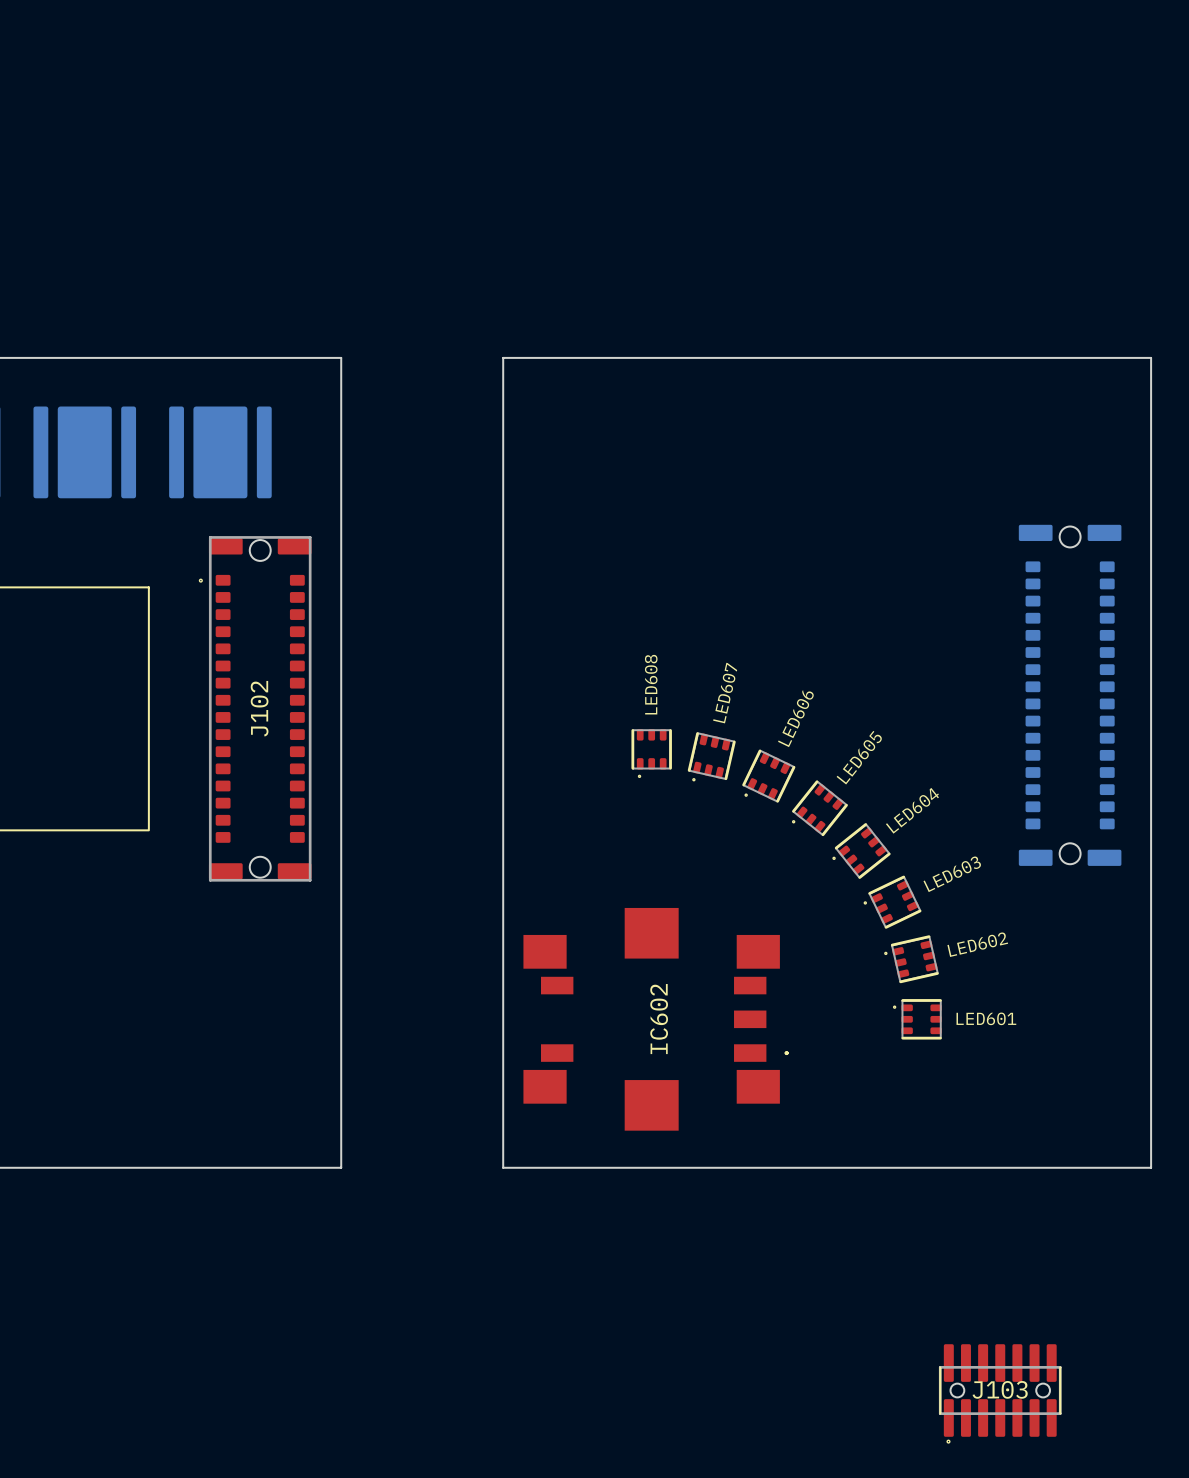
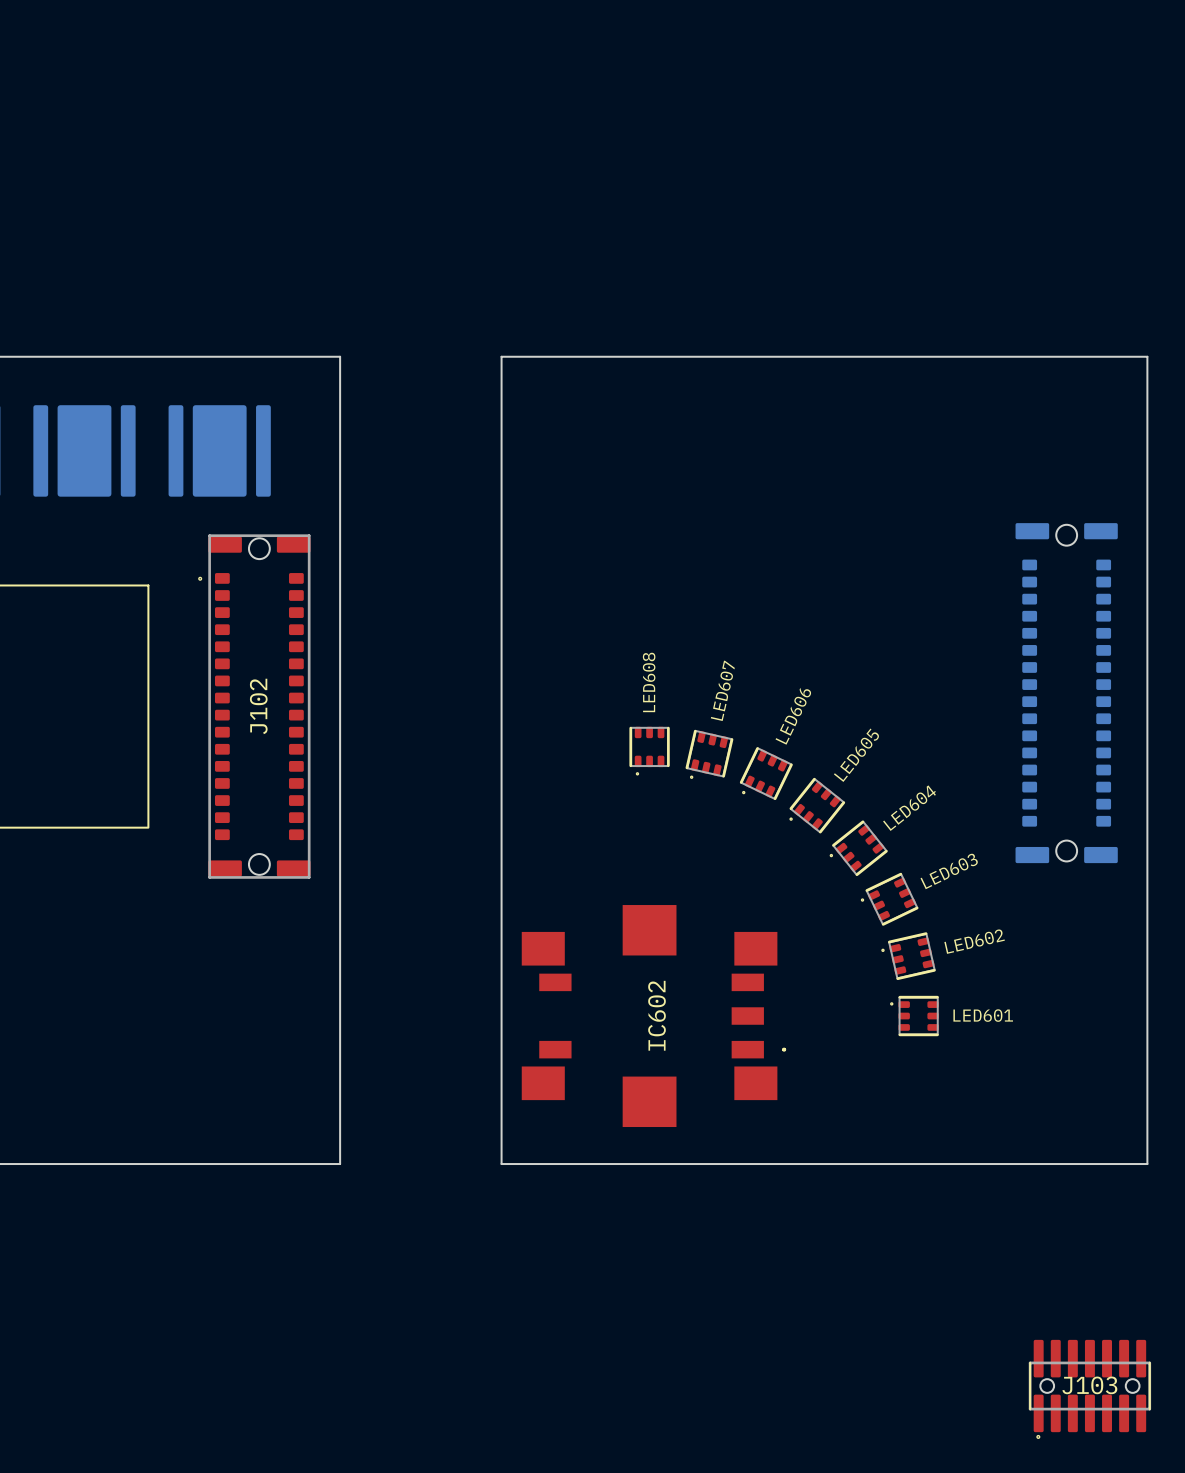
J103 position: (1000, 1393) -> (1089, 1389)

